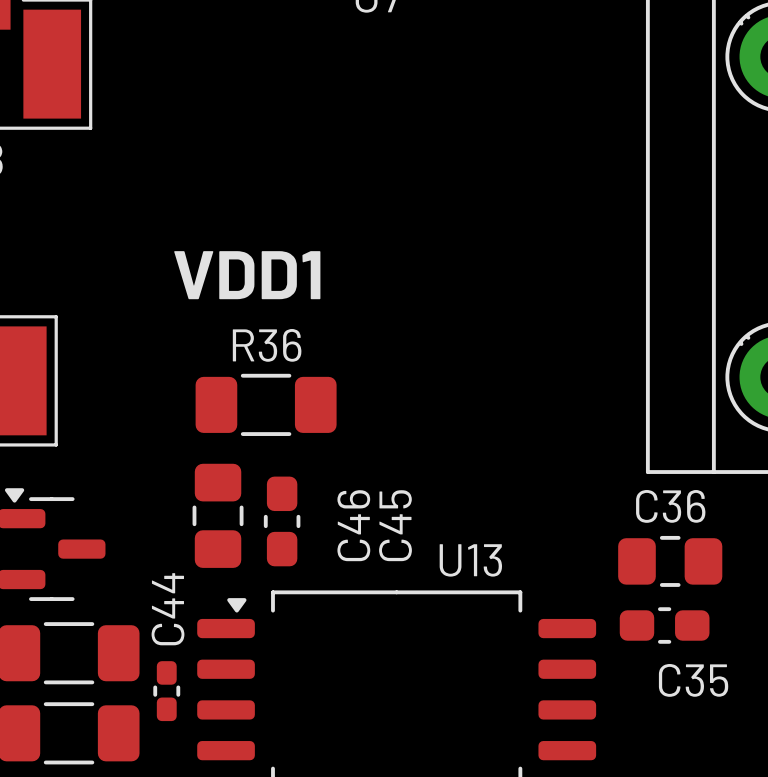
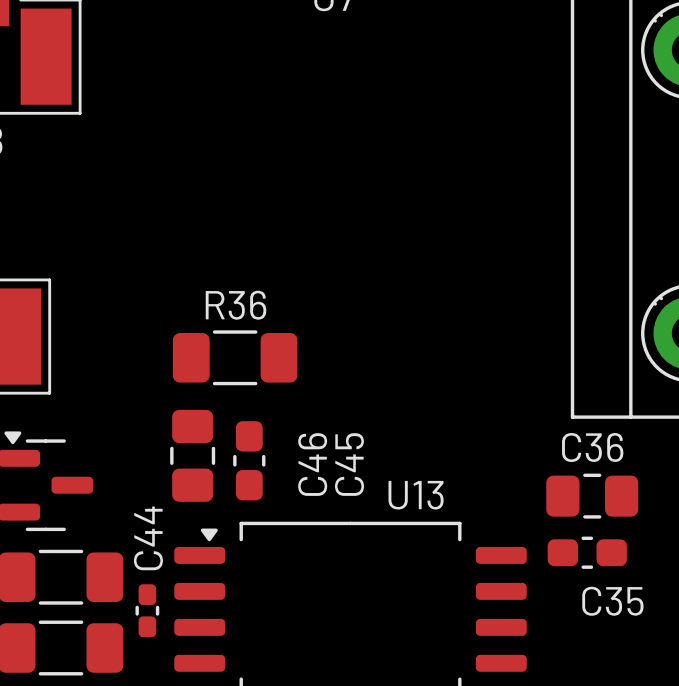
text: VDD1 (247, 275) -> none

